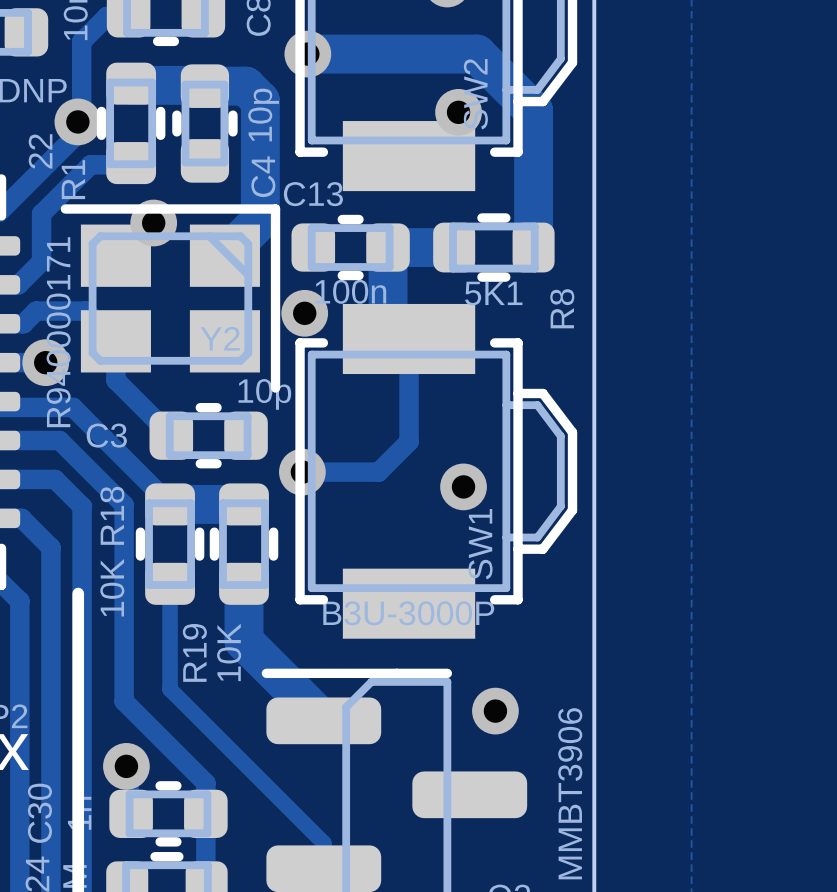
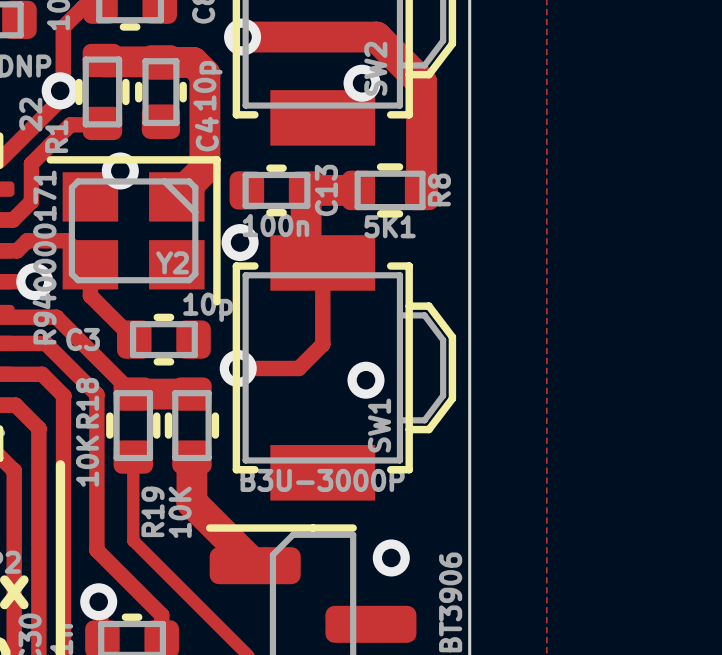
C13 name rotation: 0° (313, 194) -> 90° counterclockwise (326, 190)
C13 name position: C13 (313, 194) -> C13 (326, 190)
R8 name position: R8 (562, 308) -> R8 (439, 189)

